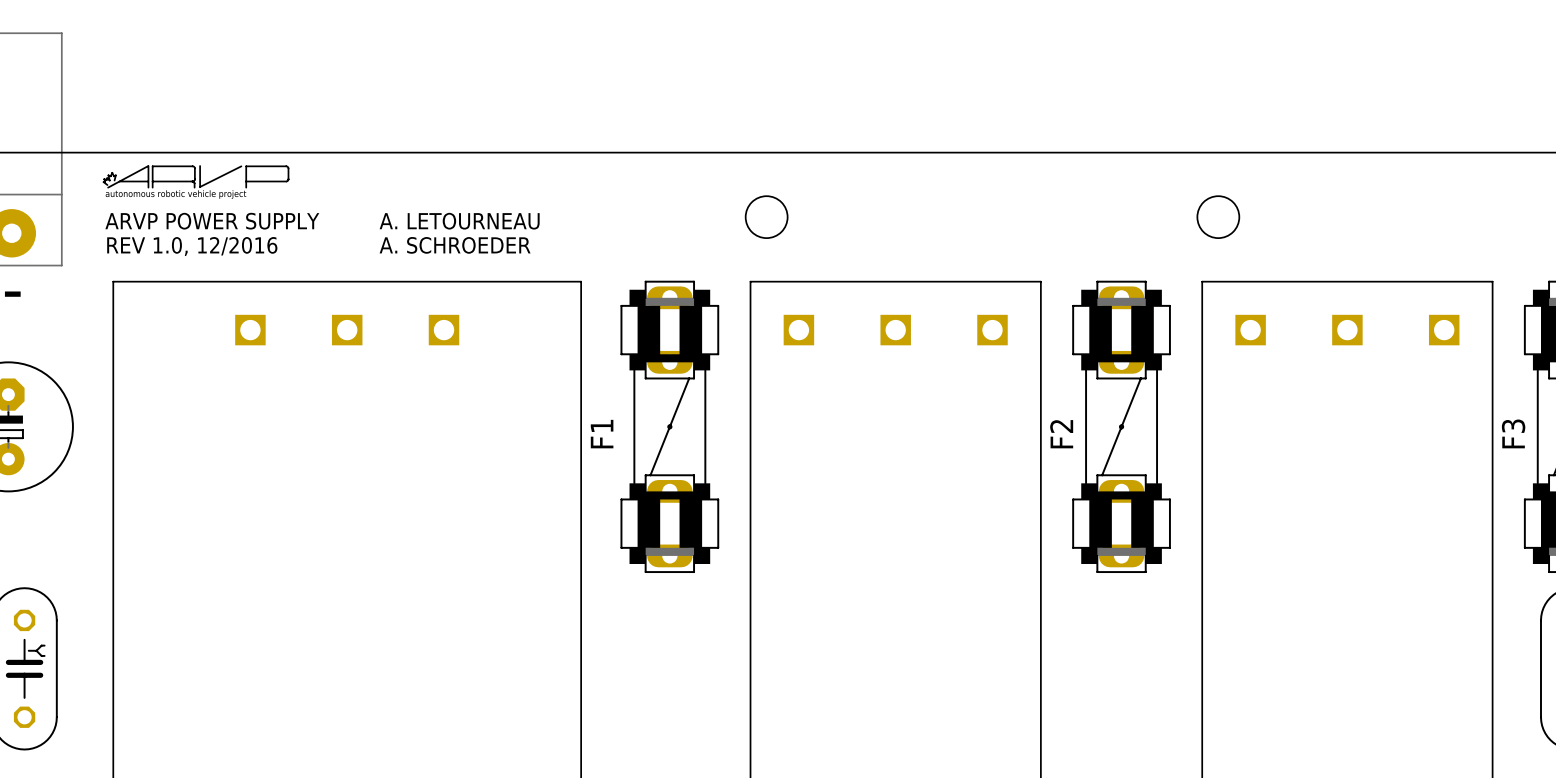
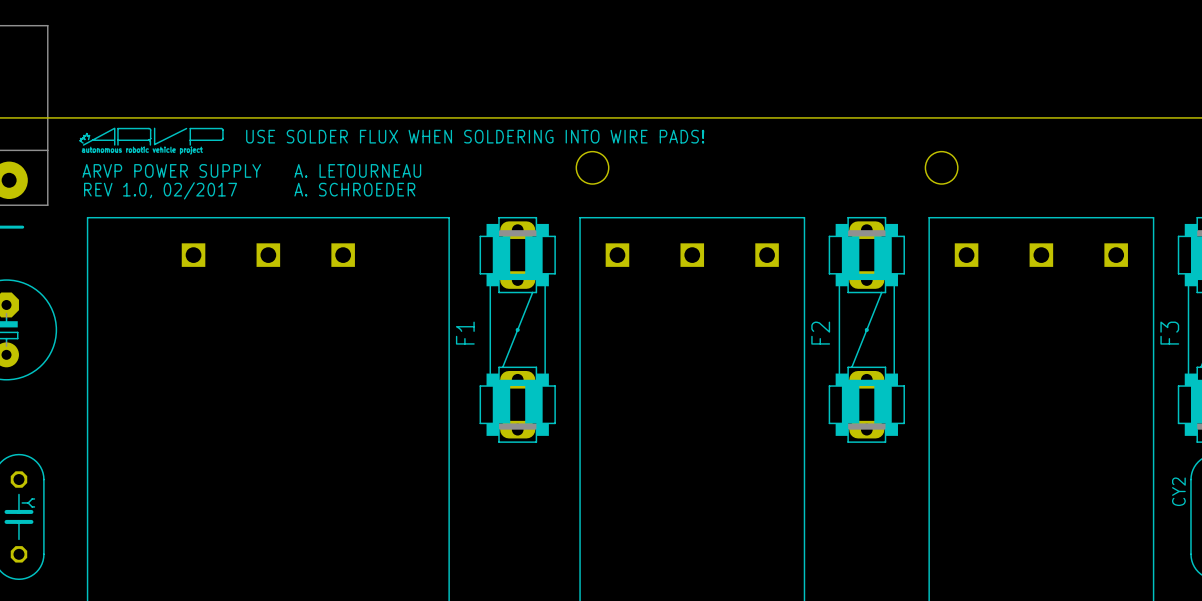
text: none -> USE SOLDER FLUX WHEN SOLDERING INTO WIRE PADS! (475, 136)
text: REV 1.0, 12/2016 (192, 246) -> REV 1.0, 02/2017 (160, 190)
CY2 name: none -> CY2 (1178, 491)

